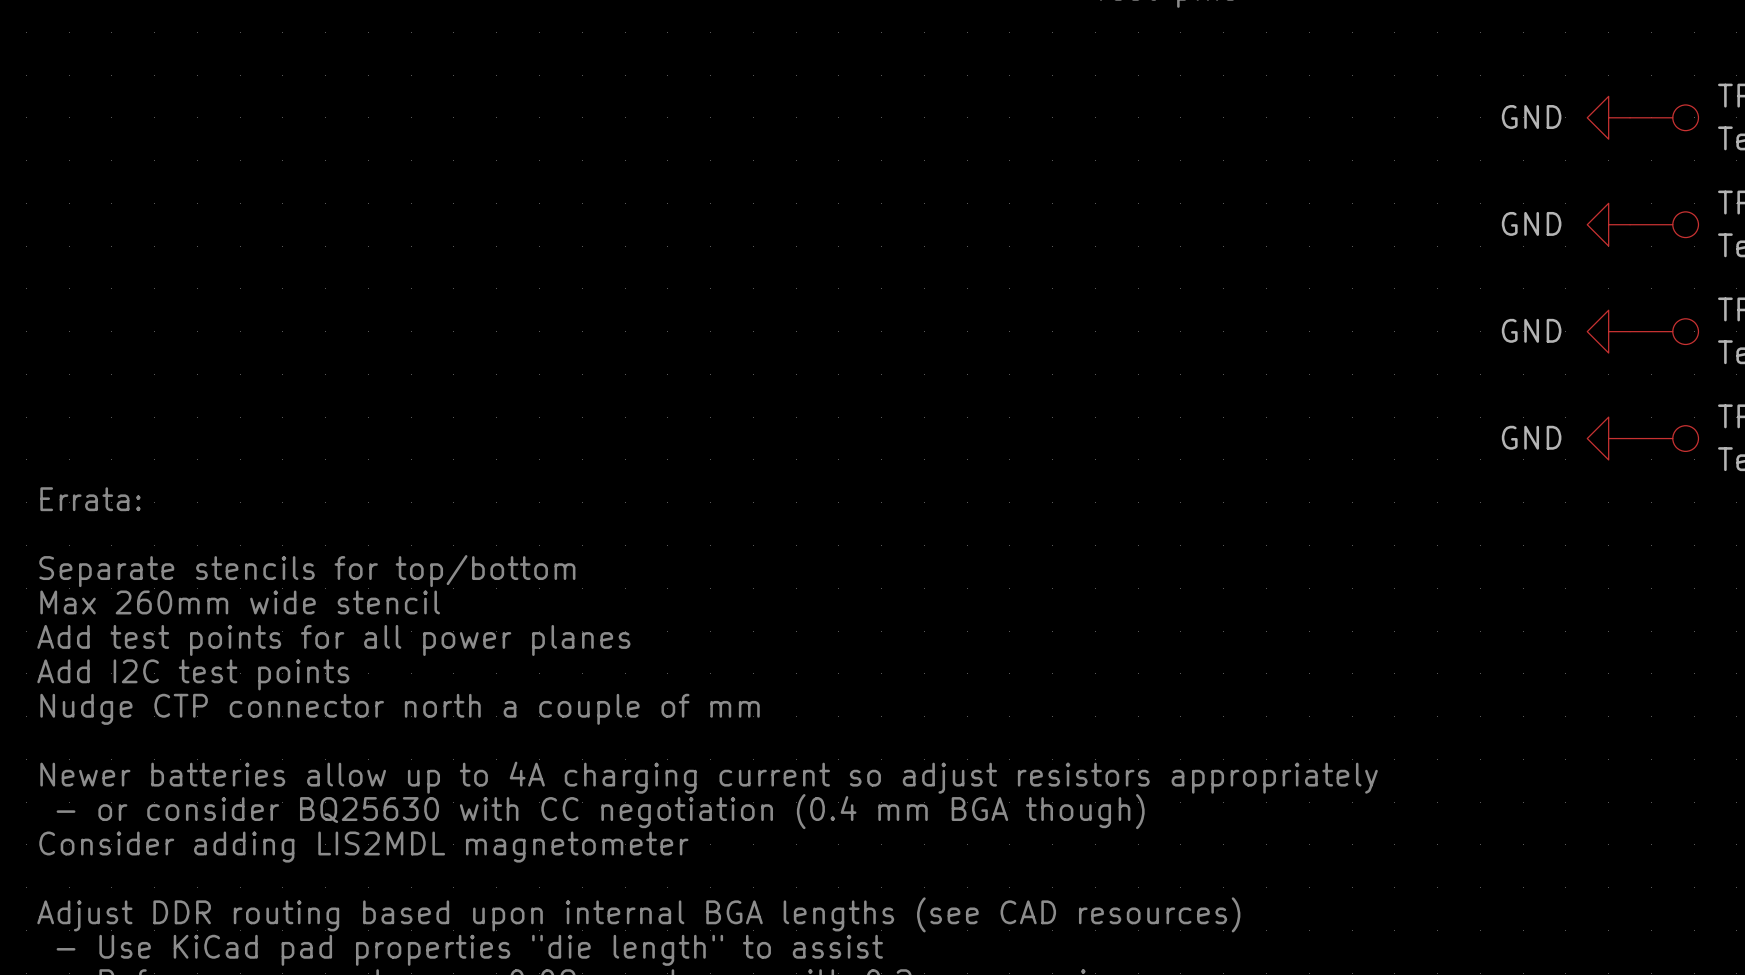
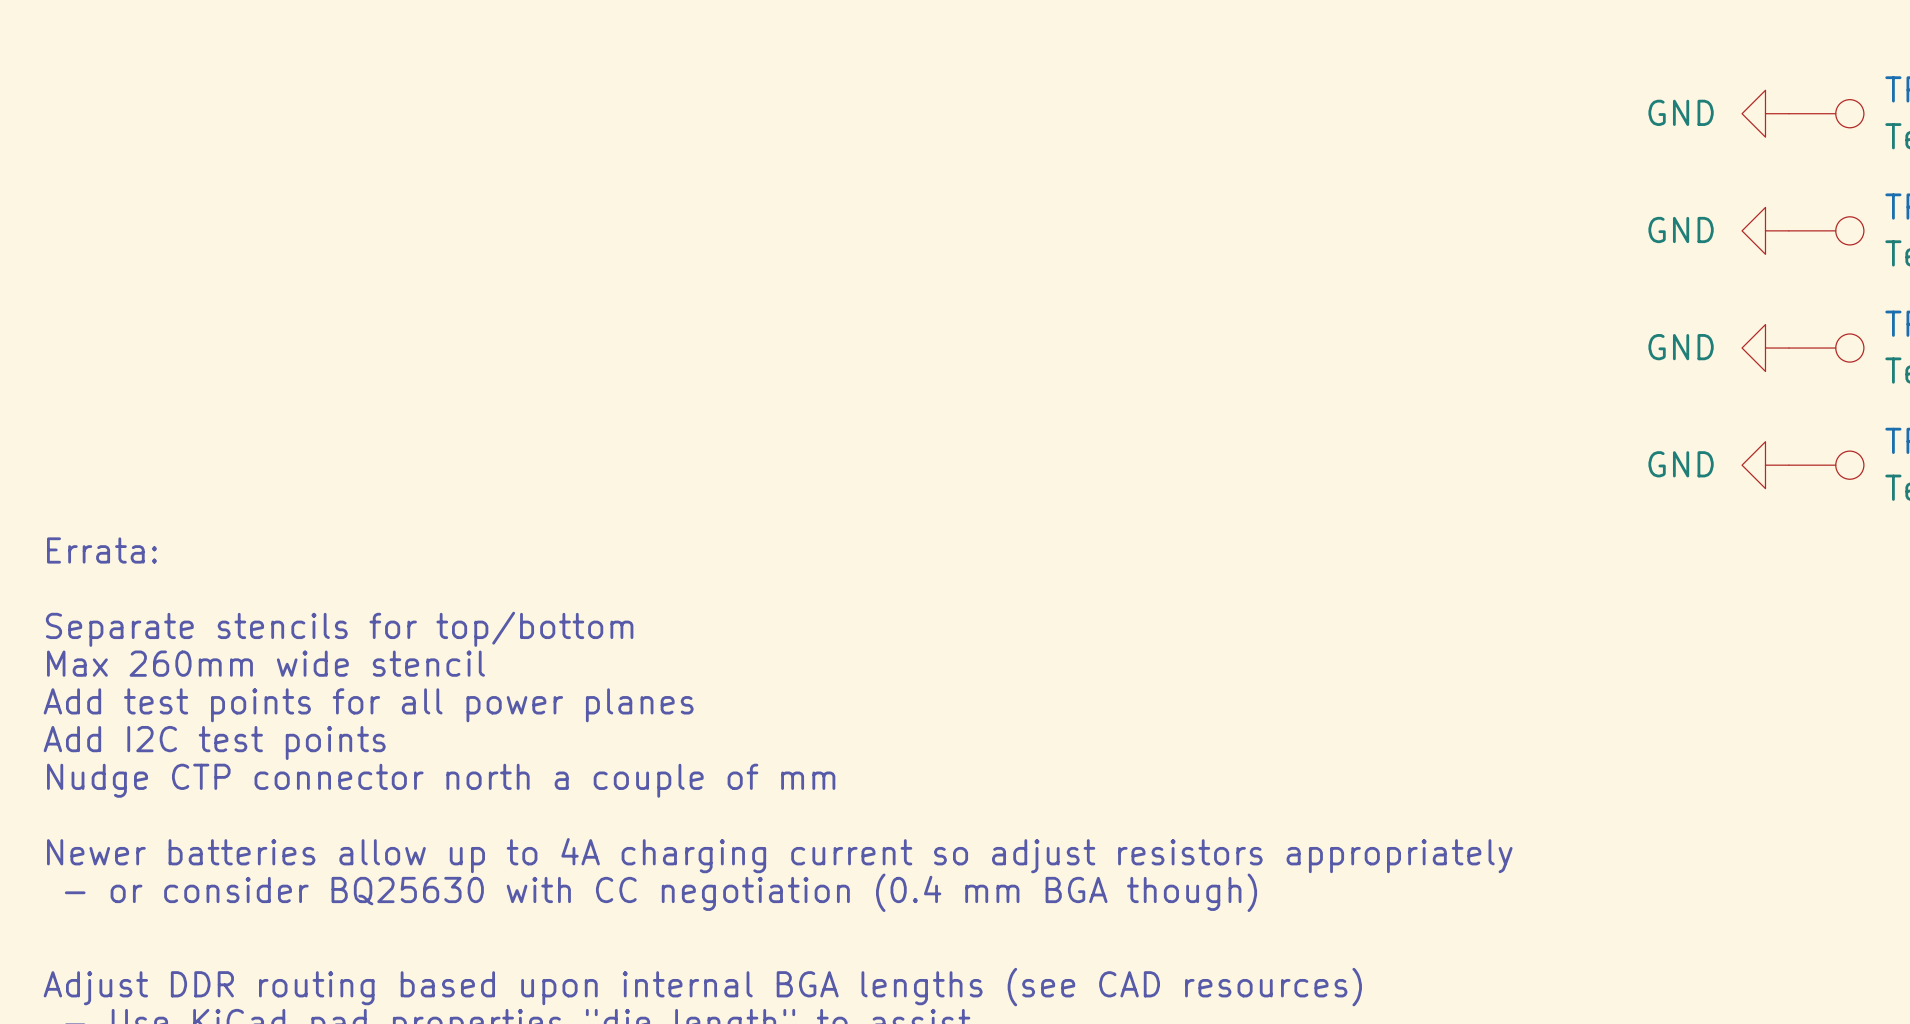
text position: Errata: (90, 499) -> Errata: (101, 550)
text position: Separate stencils for top/bottom (307, 571) -> Separate stencils for top/bottom (339, 629)
text position: Max 260mm wide stencil (240, 602) -> Max 260mm wide stencil (265, 663)
text position: Add test points for all power planes (333, 640) -> Add test points for all power planes (368, 705)
text position: Add I2C test points (193, 674) -> Add I2C test points (214, 743)
text position: Nudge CTP connector north a couple of mm (400, 709) -> Nudge CTP connector north a couple of mm (441, 780)
text position: Newer batteries allow up to 4A charging current so adjust resistors appropriately (709, 777) -> Newer batteries allow up to 4A charging current so adjust resistors appropriately (779, 855)
text position: - or consider BQ25630 with CC negotiation (0.4 mm BGA though) (600, 811) -> - or consider BQ25630 with CC negotiation (0.4 mm BGA though) (660, 892)
text: Consider adding LIS2MDL magnetometer (363, 847) -> none

